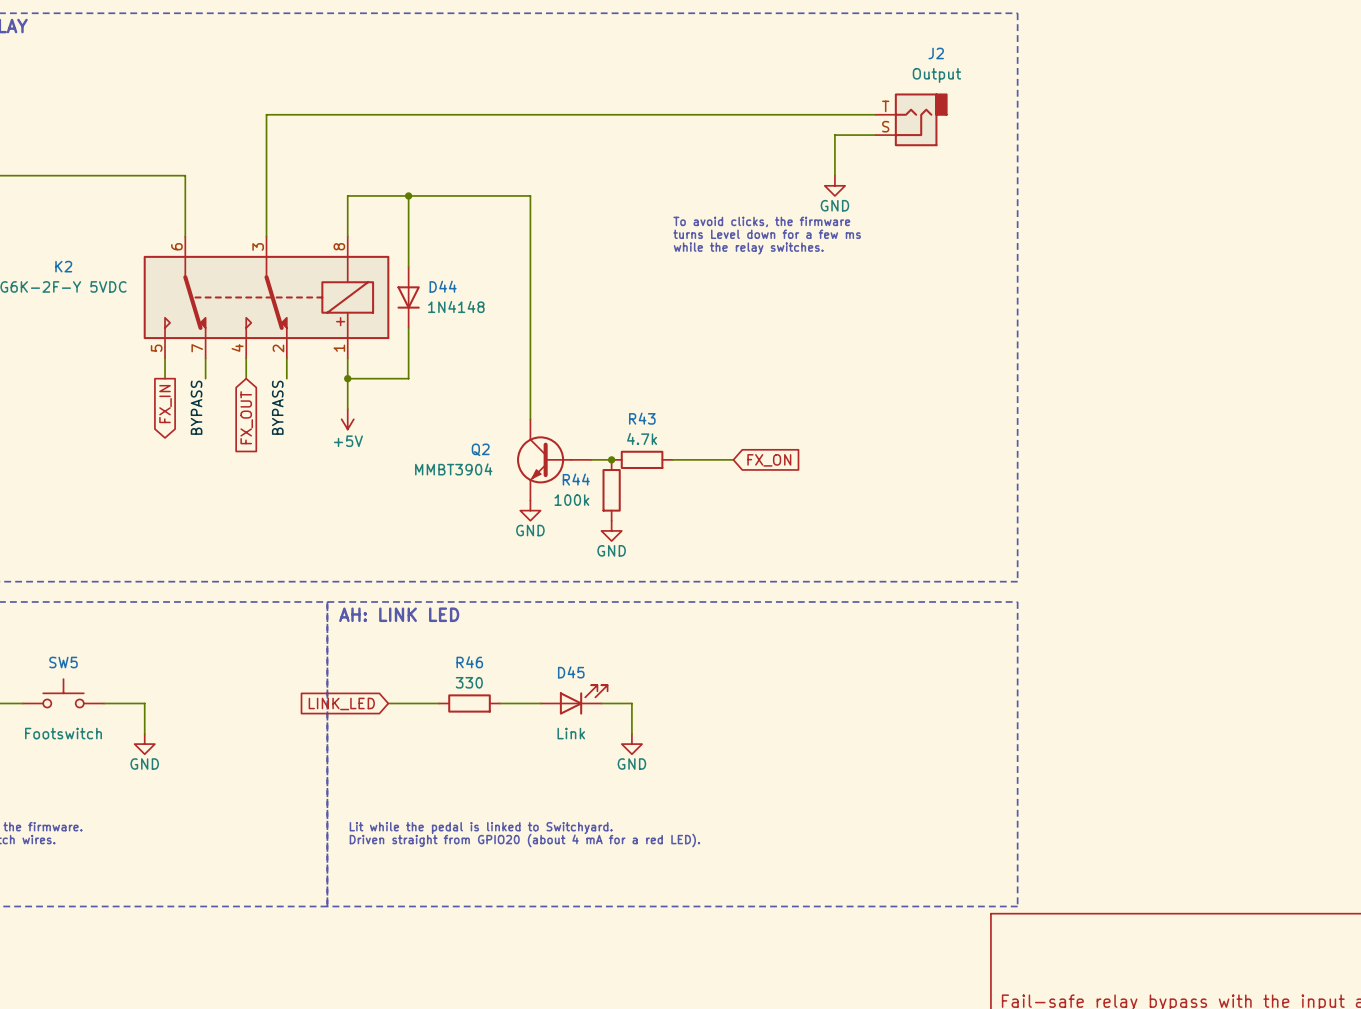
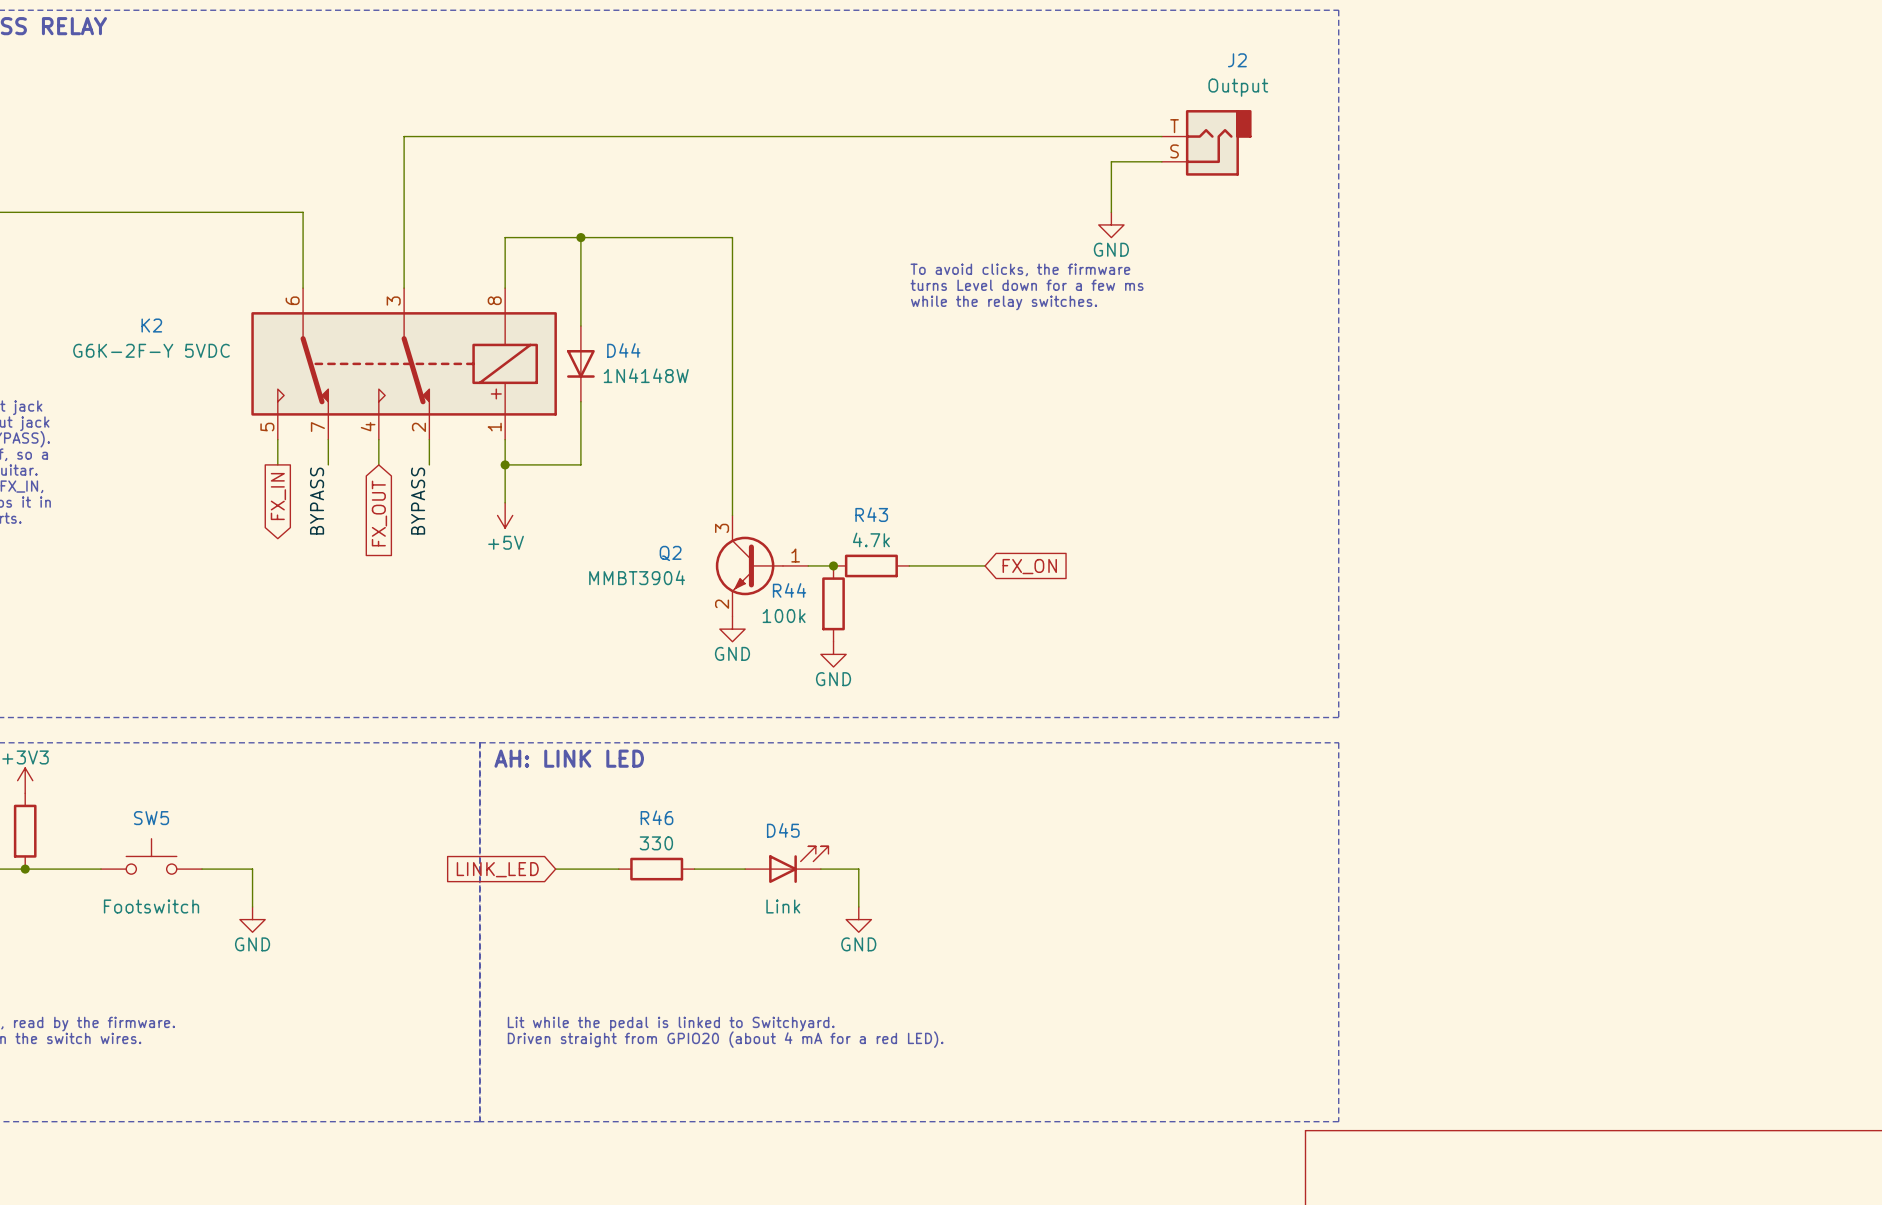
D44 value: 1N4148 (456, 307) -> 1N4148W (646, 375)
Q2 pin number: none -> 3 (722, 528)
Q2 pin number: none -> 1 (795, 555)
Q2 pin number: none -> 2 (722, 604)

